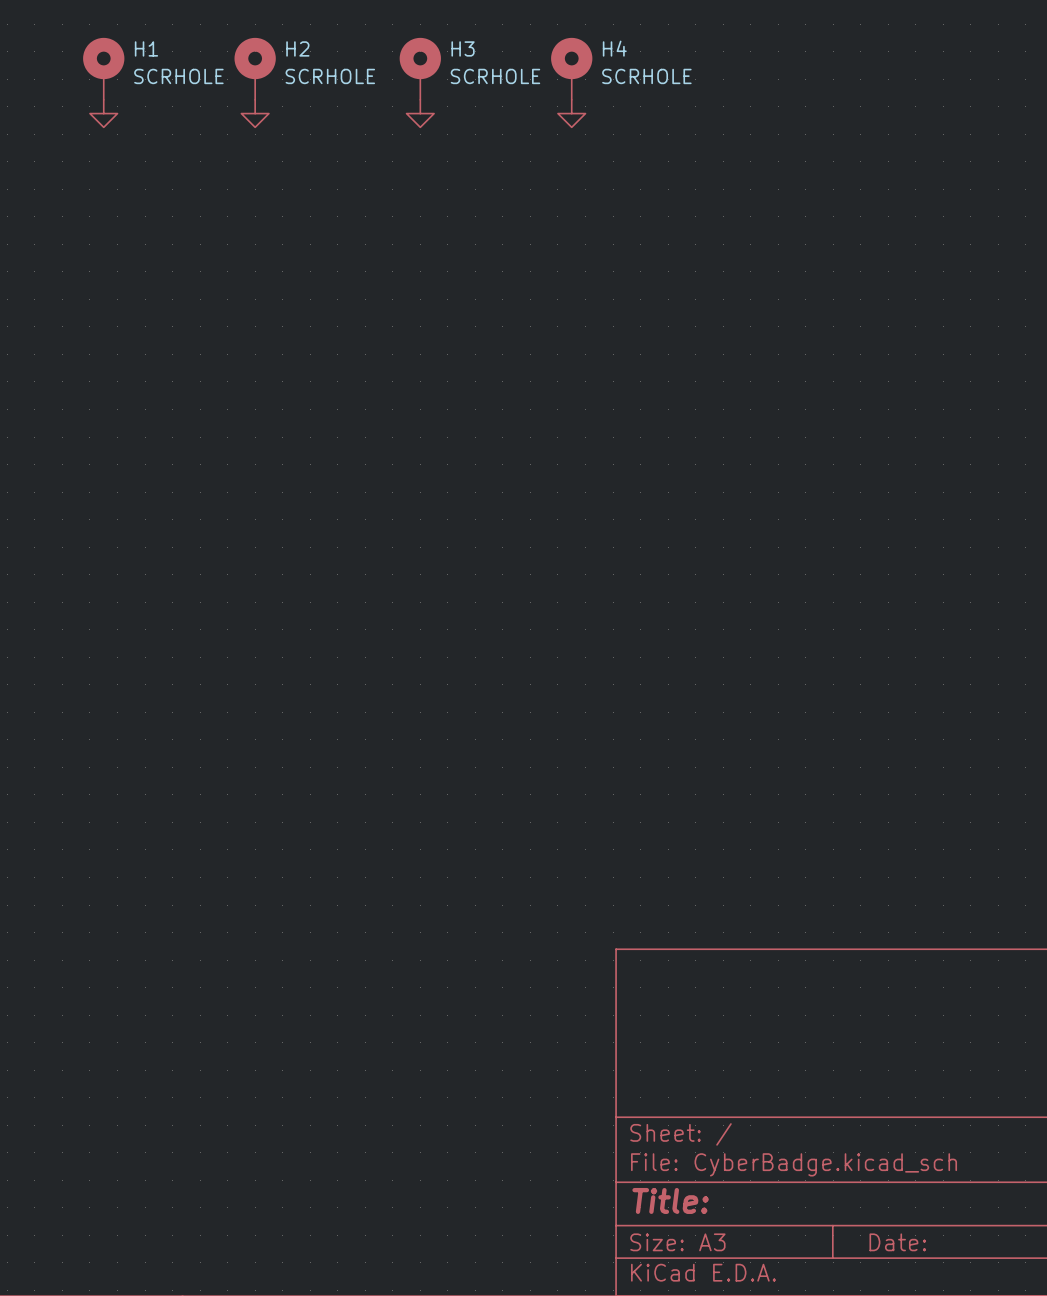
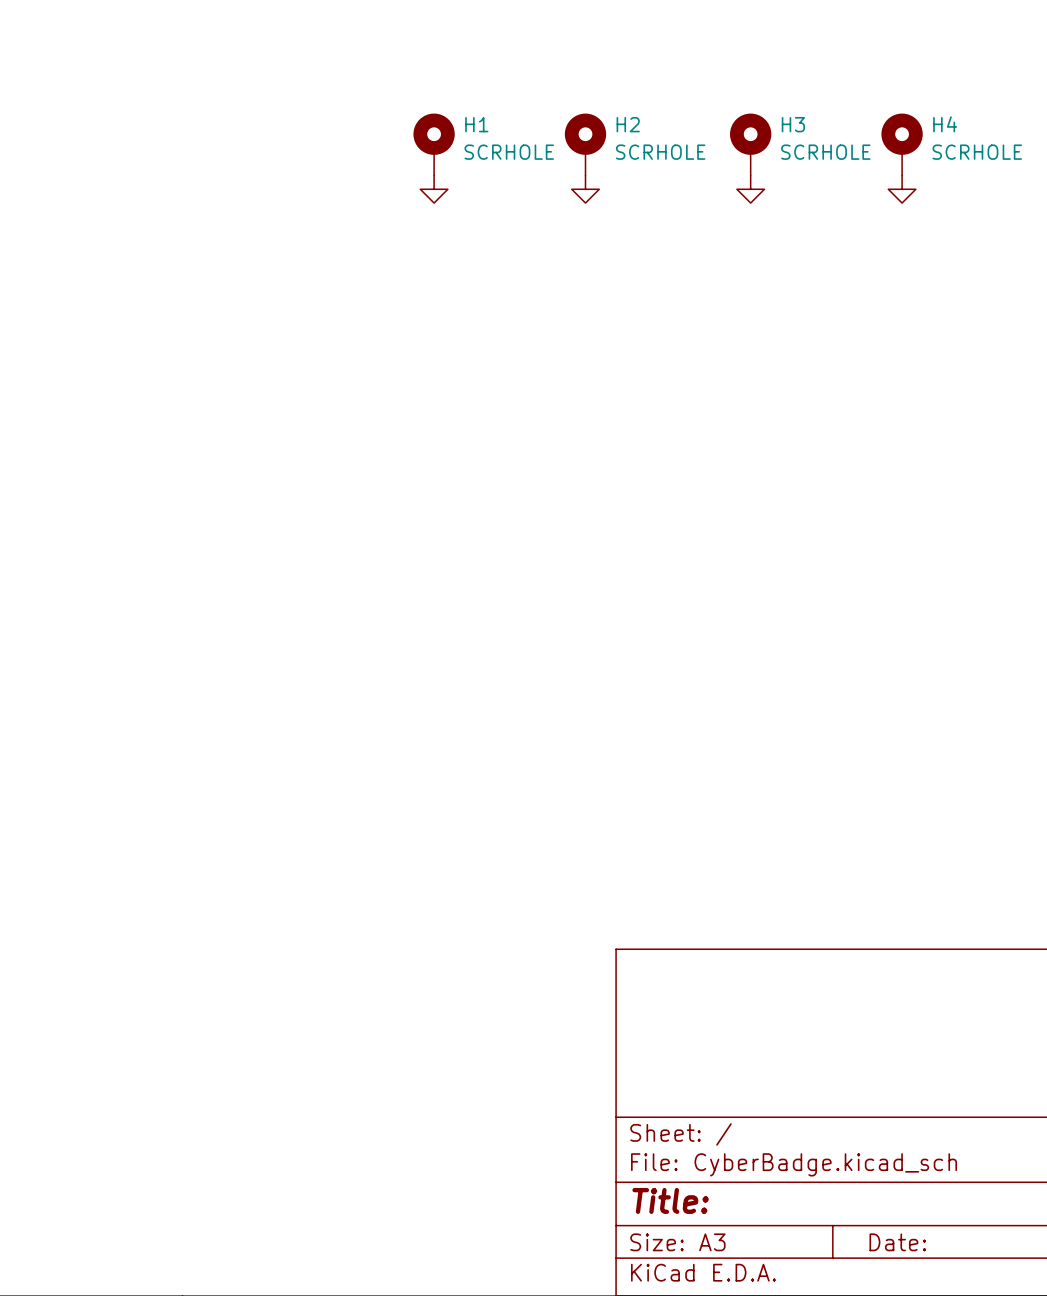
H1 position: (103, 68) -> (434, 144)
H2 position: (255, 68) -> (585, 144)
H3 position: (420, 68) -> (750, 144)
H4 position: (571, 68) -> (902, 144)
power symbol: (103, 113) -> none
power symbol: (255, 113) -> none
power symbol position: (420, 113) -> (434, 189)
power symbol position: (571, 113) -> (585, 189)
power symbol: none -> (750, 189)
power symbol: none -> (902, 189)

